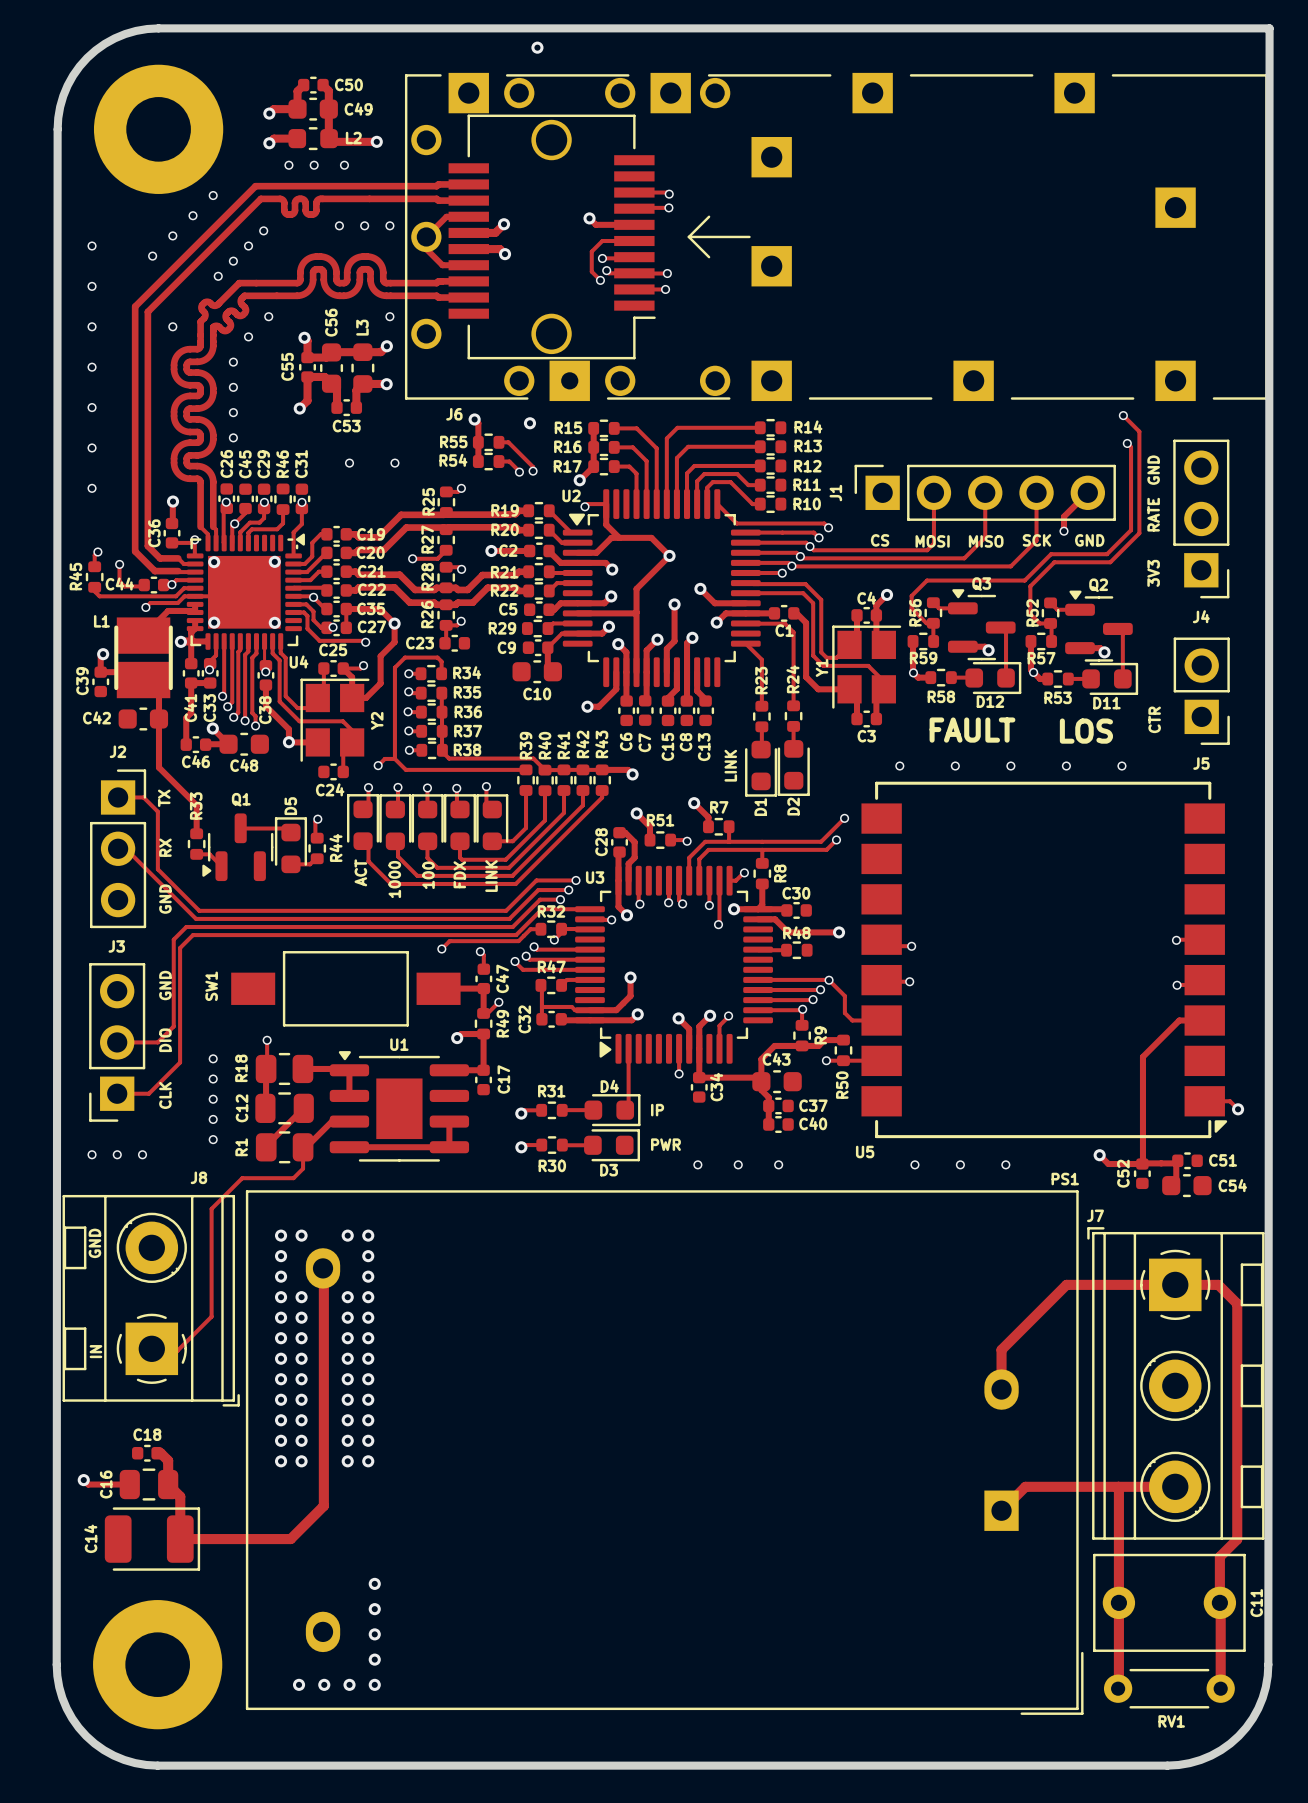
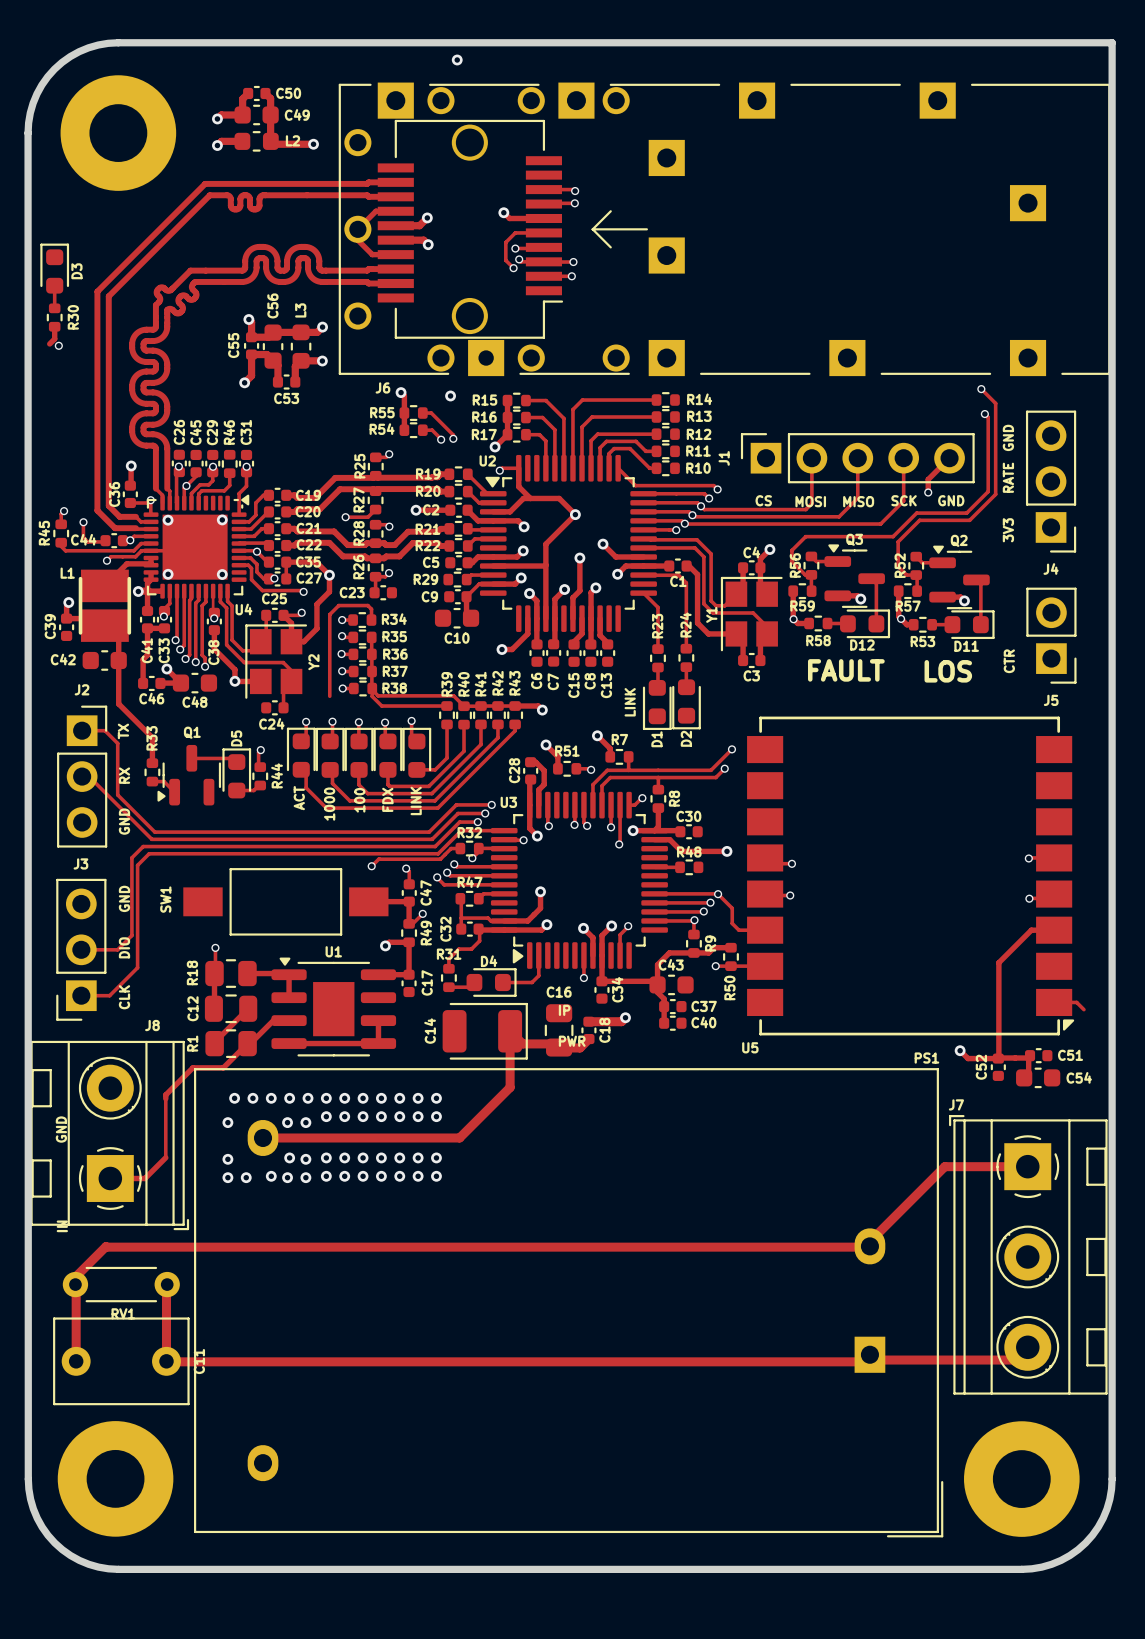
board edge: (1269, 28) (1268, 1664) (1265, 1687) (1258, 1708) (1238, 1736) (1211, 1755) (1178, 1765) (157, 1765) (135, 1763) (113, 1755) (86, 1736) (72, 1718) (59, 1687) (56, 1664) (57, 129) -> (1112, 42) (1112, 1479) (1107, 1508) (1092, 1535) (1078, 1549) (1060, 1560) (1031, 1568) (118, 1569) (98, 1567) (79, 1560) (54, 1542) (42, 1527) (33, 1508) (28, 1479) (28, 133)
via: (288, 165) -> none
via: (314, 165) -> none
via: (344, 165) -> none
via: (213, 195) -> none
via: (193, 215) -> none
via: (339, 225) -> none
via: (364, 225) -> none
via: (389, 225) -> none
via: (263, 230) -> none
via: (172, 235) -> none
via: (92, 246) -> none
via: (248, 246) -> none
via: (152, 256) -> none
via: (233, 261) -> none
via: (218, 276) -> none
via: (92, 286) -> none
track: none -> (54, 285) (54, 308)
via: (268, 316) -> none
via: (389, 316) -> none
via: (92, 326) -> none
via: (172, 326) -> none
via: (248, 336) -> none
track: none -> (54, 326) (54, 338) (49, 343)
via: (233, 362) -> none
via: (233, 387) -> none
via: (92, 407) -> none
via: (233, 412) -> none
via: (233, 437) -> none
via: (92, 447) -> none
via: (349, 463) -> none
via: (394, 463) -> none
via: (92, 488) -> none
track: (378, 765) (384, 758) (394, 758) (405, 769) (453, 769) -> (372, 689) (372, 696) (381, 706)
via: (378, 765) -> none
via: (899, 766) -> none
via: (955, 766) -> none
via: (1010, 766) -> none
via: (1066, 766) -> none
via: (1121, 766) -> none
track: none -> (479, 930) (479, 940) (471, 949) (458, 949) (448, 959) (448, 968)
via: (213, 1058) -> none
track: (628, 1071) (628, 1106) (625, 1110) -> (538, 975) (532, 982) (502, 982)
track: none -> (474, 982) (469, 987) (448, 987)
via: (213, 1079) -> none
via: (213, 1099) -> none
via: (1238, 1109) -> none
track: (541, 1110) (524, 1110) (521, 1113) -> none
R31 rotation: 0° (551, 1110) -> 90° clockwise (448, 977)
R31 position: (551, 1110) -> (448, 977)
track: (562, 1110) (593, 1110) -> none
D4 position: (612, 1110) -> (491, 982)
via: (521, 1113) -> none
track: none -> (625, 1017) (621, 1021) (588, 1021)
via: none -> (625, 1017)
via: (213, 1119) -> none
via: (213, 1139) -> none
track: none -> (588, 1039) (579, 1047) (559, 1047) (555, 1043) (522, 1043) (510, 1031) (510, 1087) (459, 1137) (263, 1137)
track: (541, 1145) (523, 1145) (521, 1147) -> none
R30 rotation: 0° (552, 1145) -> 90° clockwise (54, 317)
R30 position: (552, 1145) -> (54, 317)
track: (562, 1145) (592, 1145) -> none
D3 rotation: 0° (612, 1145) -> 90° counterclockwise (54, 268)
D3 position: (612, 1145) -> (54, 268)
track: (303, 1147) (303, 1168) (293, 1178) (242, 1178) (211, 1208) -> (247, 1043) (223, 1067) (192, 1067) (165, 1094) (165, 1098)
via: (521, 1147) -> none
via: (92, 1154) -> none
via: (117, 1154) -> none
via: (142, 1154) -> none
via: (697, 1164) -> none
via: (738, 1164) -> none
via: (778, 1164) -> none
via: (914, 1164) -> none
via: (960, 1164) -> none
via: (1005, 1164) -> none
via: none -> (234, 1098)
via: none -> (252, 1098)
via: none -> (271, 1098)
via: none -> (289, 1098)
via: none -> (308, 1098)
via: none -> (326, 1098)
via: none -> (344, 1098)
via: none -> (363, 1098)
via: none -> (381, 1098)
via: none -> (399, 1098)
via: none -> (418, 1098)
via: none -> (436, 1098)
via: none -> (326, 1116)
via: none -> (344, 1116)
via: none -> (363, 1116)
via: none -> (381, 1116)
via: none -> (399, 1116)
via: none -> (418, 1116)
via: none -> (436, 1116)
via: (301, 1235) -> none
via: (281, 1256) -> none
via: (368, 1256) -> none
track: (323, 1267) (323, 1505) (290, 1539) (180, 1539) (180, 1496) (168, 1484) (168, 1460) (160, 1453) (157, 1453) -> none
track: (211, 1274) (211, 1316) (177, 1350) (149, 1350) -> (165, 1157) (145, 1178) (110, 1178)
via: none -> (289, 1157)
via: none -> (326, 1157)
via: none -> (344, 1157)
via: none -> (363, 1157)
via: none -> (381, 1157)
via: none -> (399, 1157)
via: none -> (418, 1157)
via: none -> (436, 1157)
track: (1082, 1284) (1066, 1284) (1001, 1349) (1000, 1390) -> (944, 1166) (869, 1241) (869, 1247) (105, 1246) (75, 1277)
track: (1175, 1284) (1218, 1284) (1237, 1303) (1237, 1539) (1219, 1556) (1220, 1688) -> none
via: none -> (271, 1176)
via: none -> (326, 1176)
via: none -> (344, 1176)
via: none -> (363, 1176)
via: none -> (381, 1176)
via: none -> (399, 1176)
via: none -> (418, 1176)
via: none -> (436, 1176)
J8 position: (151, 1300) -> (109, 1135)
via: (281, 1317) -> none
via: (301, 1317) -> none
via: (347, 1317) -> none
via: (368, 1317) -> none
via: (281, 1338) -> none
via: (301, 1338) -> none
via: (347, 1338) -> none
via: (368, 1338) -> none
via: (281, 1358) -> none
via: (301, 1358) -> none
via: (347, 1358) -> none
via: (368, 1358) -> none
via: (281, 1379) -> none
via: (301, 1379) -> none
via: (347, 1379) -> none
via: (368, 1379) -> none
via: (281, 1399) -> none
via: (301, 1399) -> none
via: (347, 1399) -> none
via: (368, 1399) -> none
track: none -> (167, 1284) (166, 1361) (862, 1361) (869, 1354) (875, 1360) (1015, 1360)
via: (281, 1420) -> none
via: (301, 1420) -> none
via: (347, 1420) -> none
via: (368, 1420) -> none
track: none -> (76, 1294) (76, 1361)
via: (281, 1440) -> none
via: (301, 1440) -> none
via: (347, 1440) -> none
via: (368, 1440) -> none
PS1 position: (664, 1452) -> (568, 1302)
C18 rotation: 0° (147, 1453) -> 90° clockwise (588, 1030)
C18 position: (147, 1453) -> (588, 1030)
via: (281, 1461) -> none
via: (301, 1461) -> none
via: (347, 1461) -> none
via: (368, 1461) -> none
track: (83, 1480) (88, 1484) (129, 1484) -> none
via: (83, 1480) -> none
C16 rotation: 0° (148, 1484) -> 90° clockwise (559, 1030)
C16 position: (148, 1484) -> (559, 1030)
track: (1118, 1486) (1118, 1688) -> none
track: (1175, 1486) (1025, 1486) (993, 1518) -> none
C14 position: (152, 1539) -> (485, 1031)
via: (374, 1583) -> none
C11 position: (1169, 1602) -> (121, 1361)
via: (374, 1609) -> none
via: (374, 1634) -> none
part: none -> (1021, 1479)
via: (374, 1659) -> none
part position: (157, 1664) -> (115, 1478)
via: (299, 1684) -> none
via: (324, 1684) -> none
via: (349, 1684) -> none
via: (374, 1684) -> none
RV1 position: (1169, 1688) -> (121, 1284)

